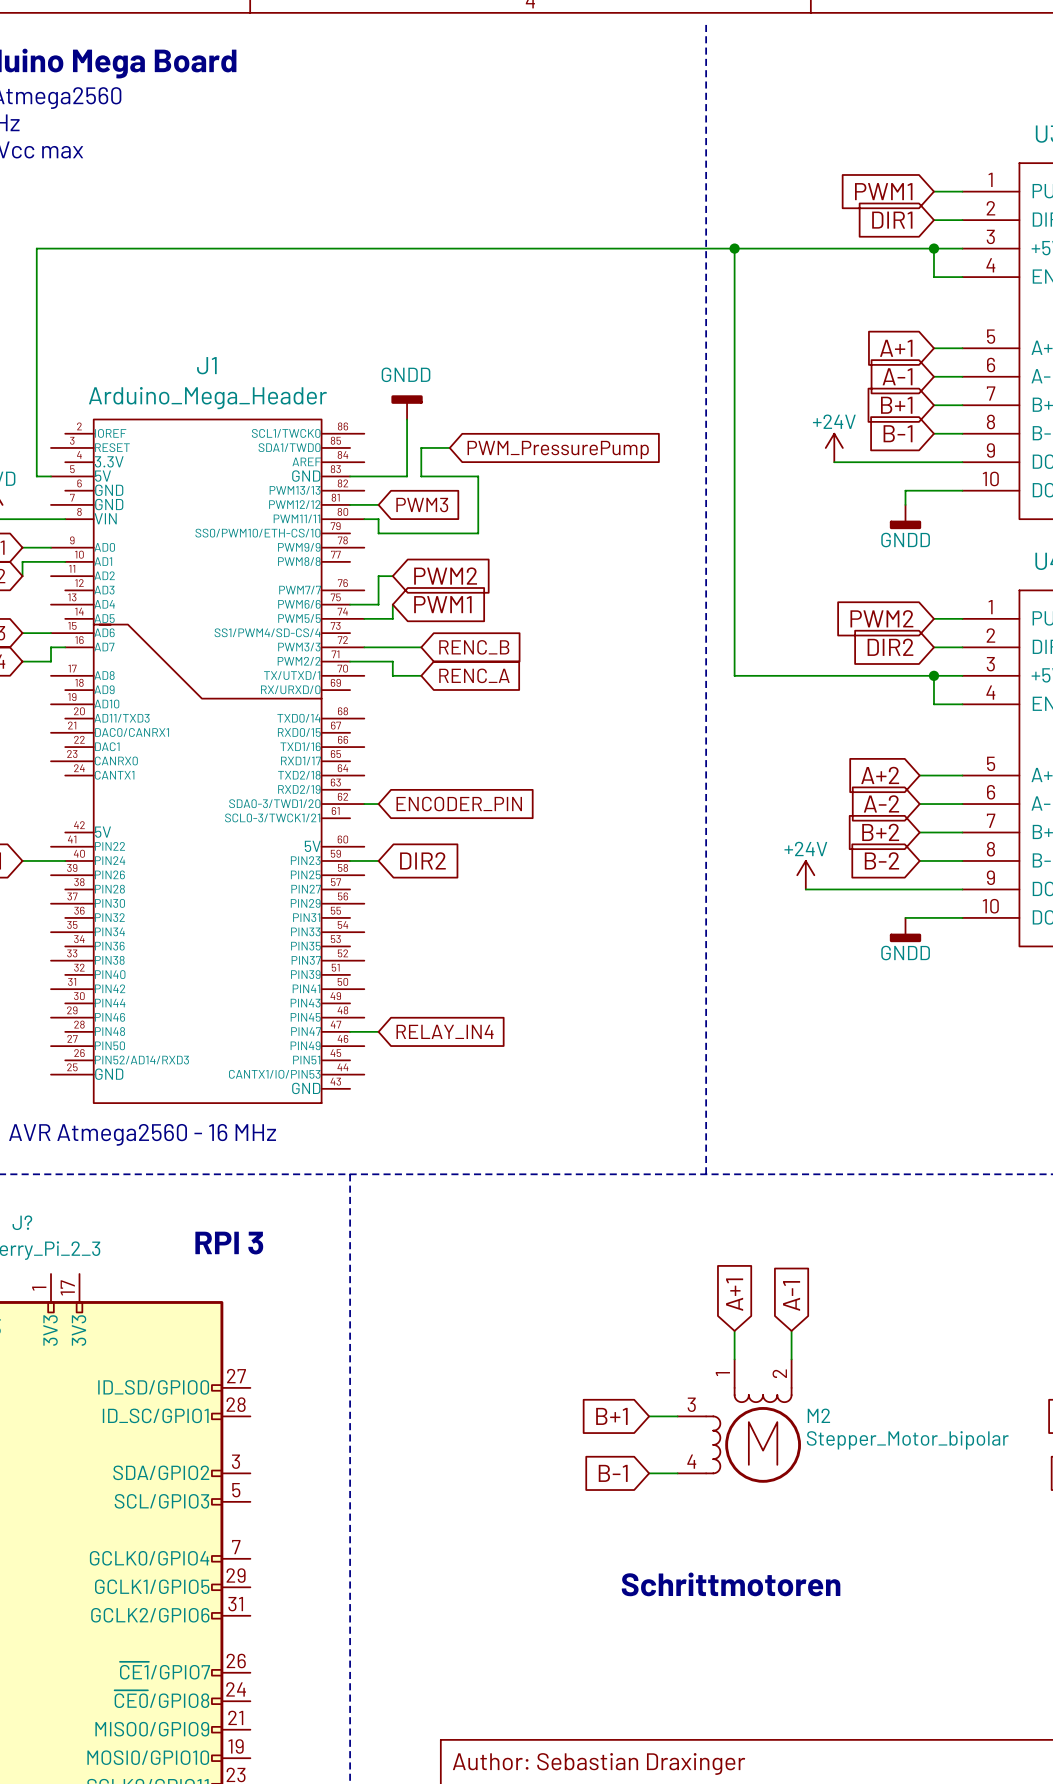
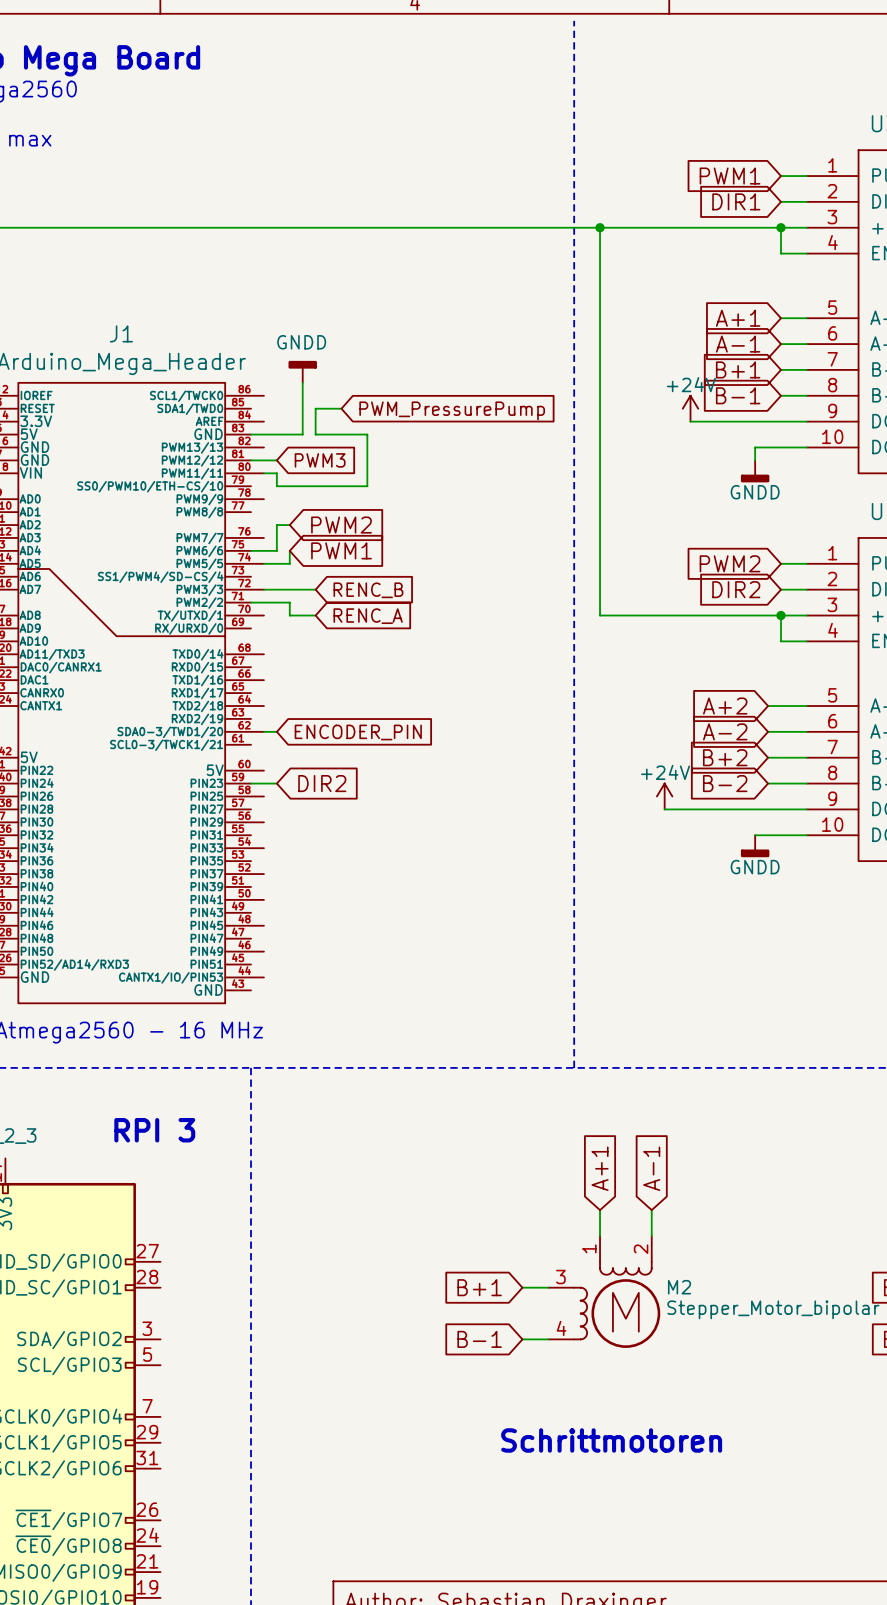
wire: (350, 1031) (378, 1031) -> none
global label: RELAY_IN4 (445, 1031) -> none

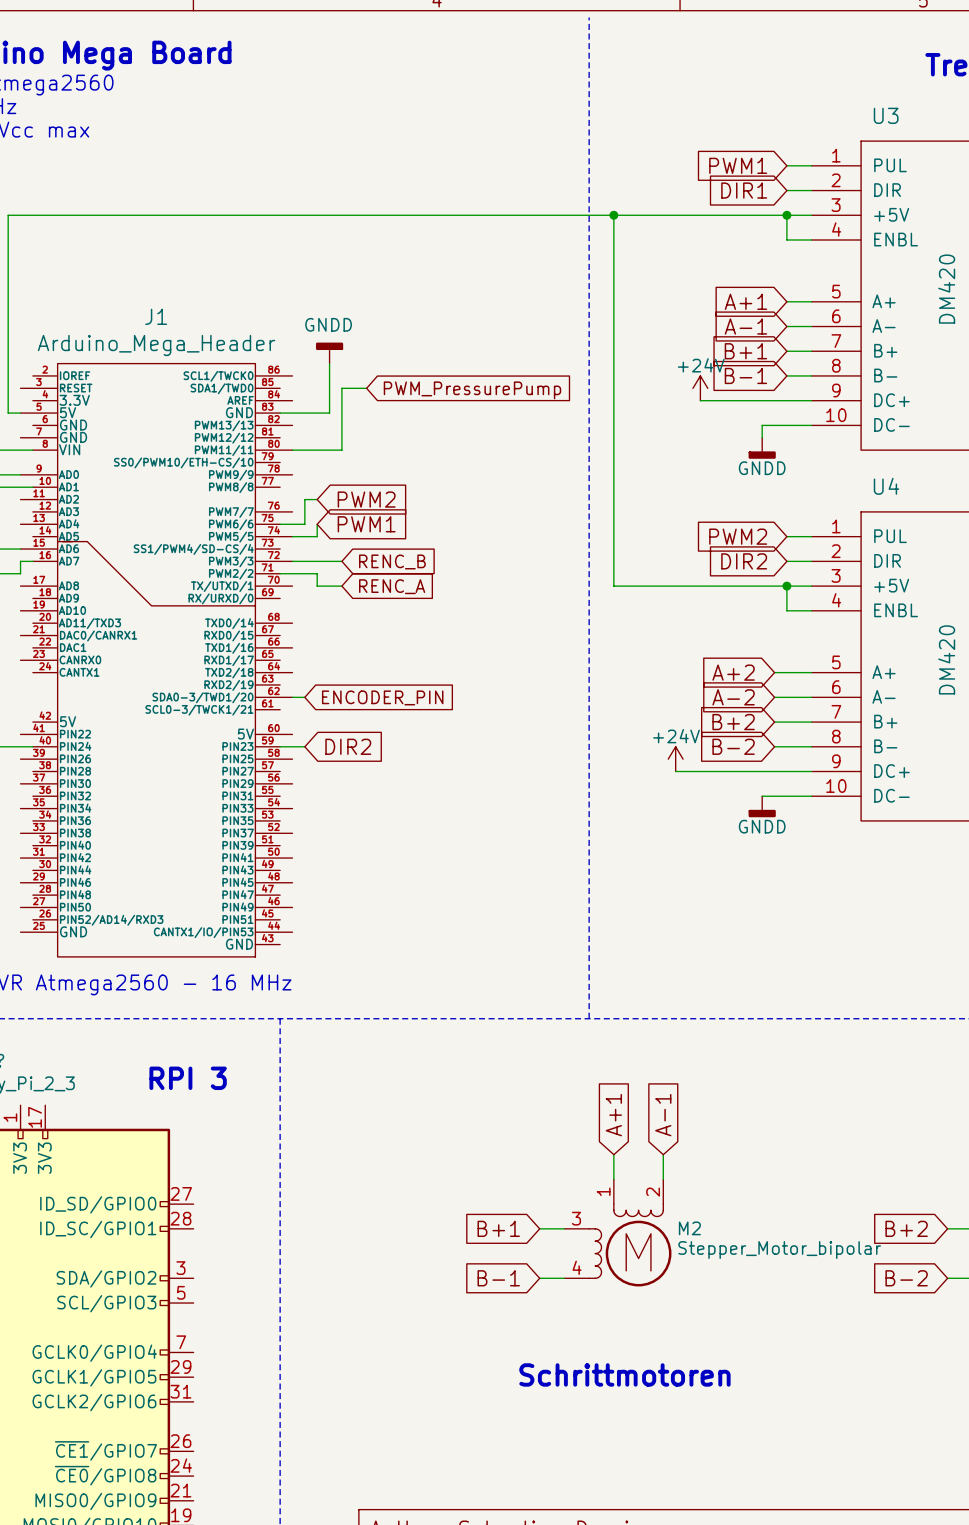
wire: (315, 434) (367, 434) (367, 486) (276, 486) (276, 473) -> (341, 413) (341, 450) (304, 450)
wire: (251, 460) (276, 460) -> none
global label: PWM3 (320, 460) -> none

